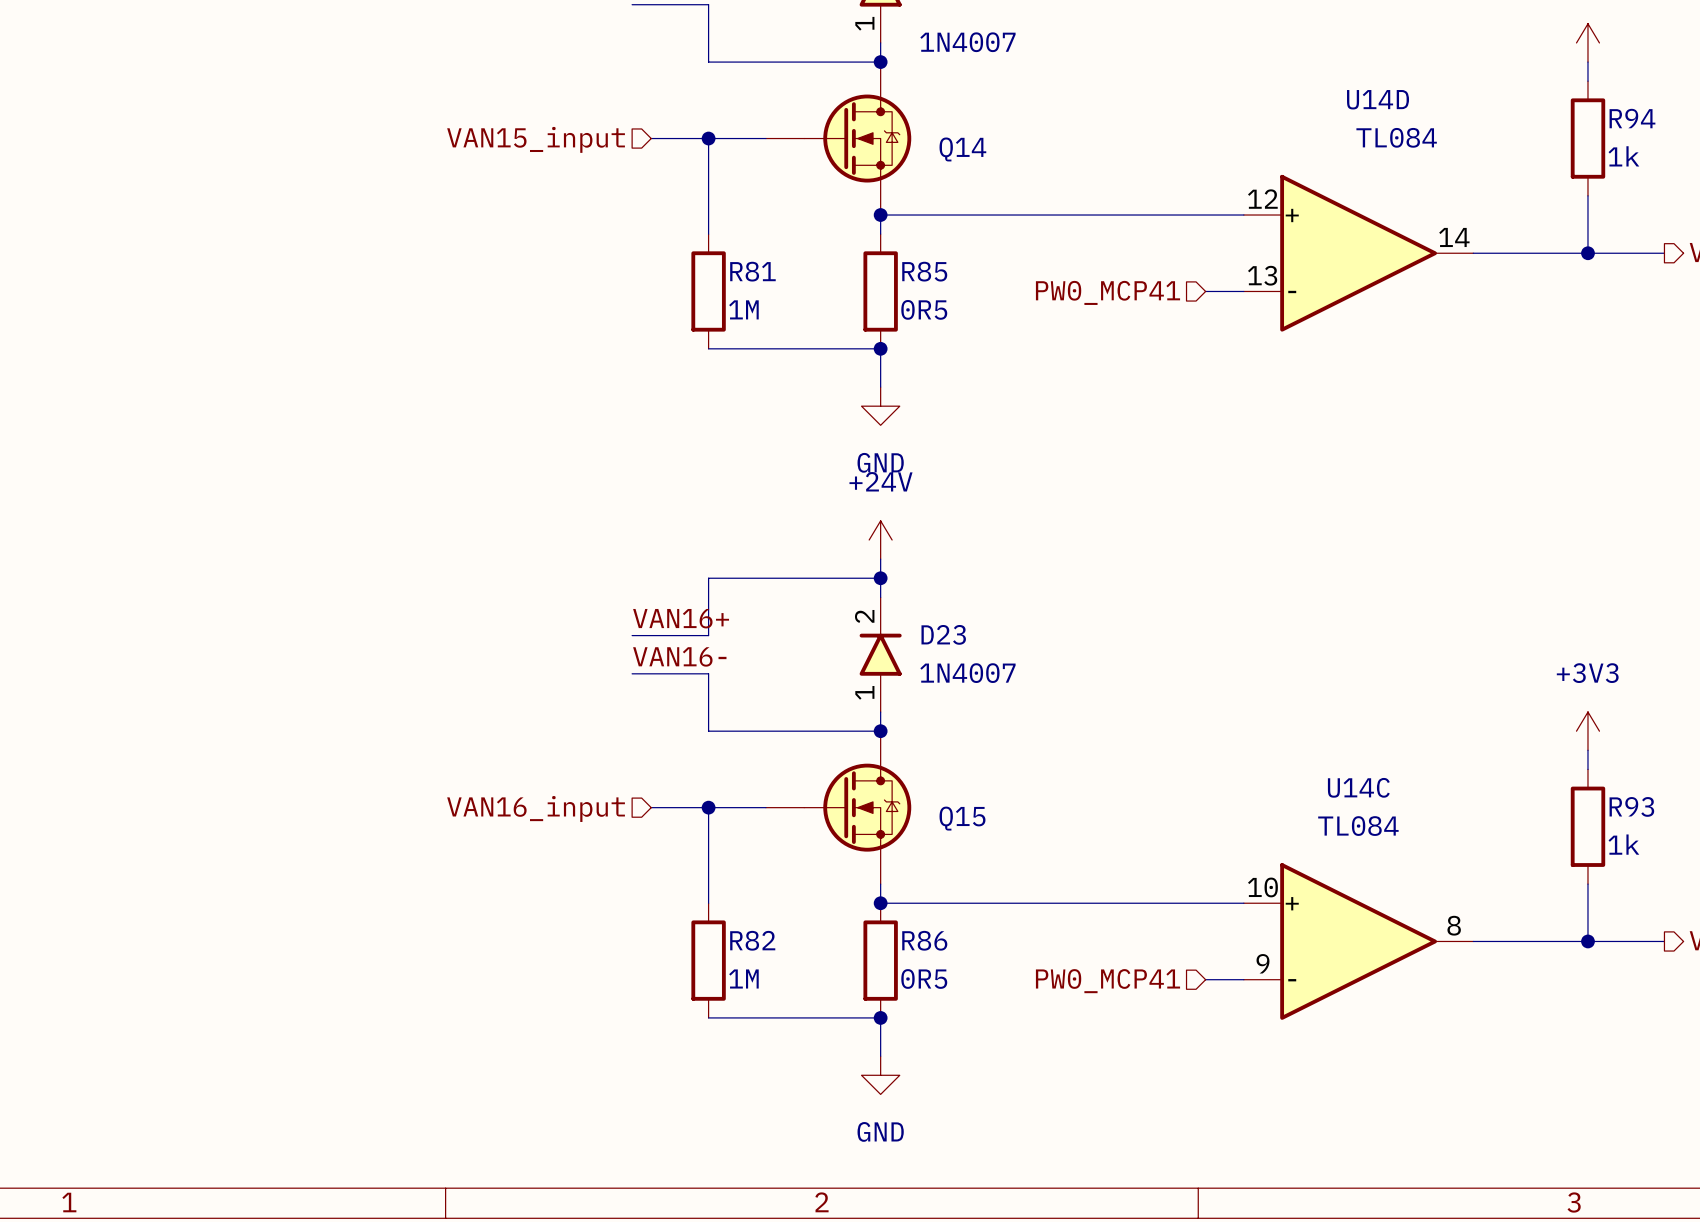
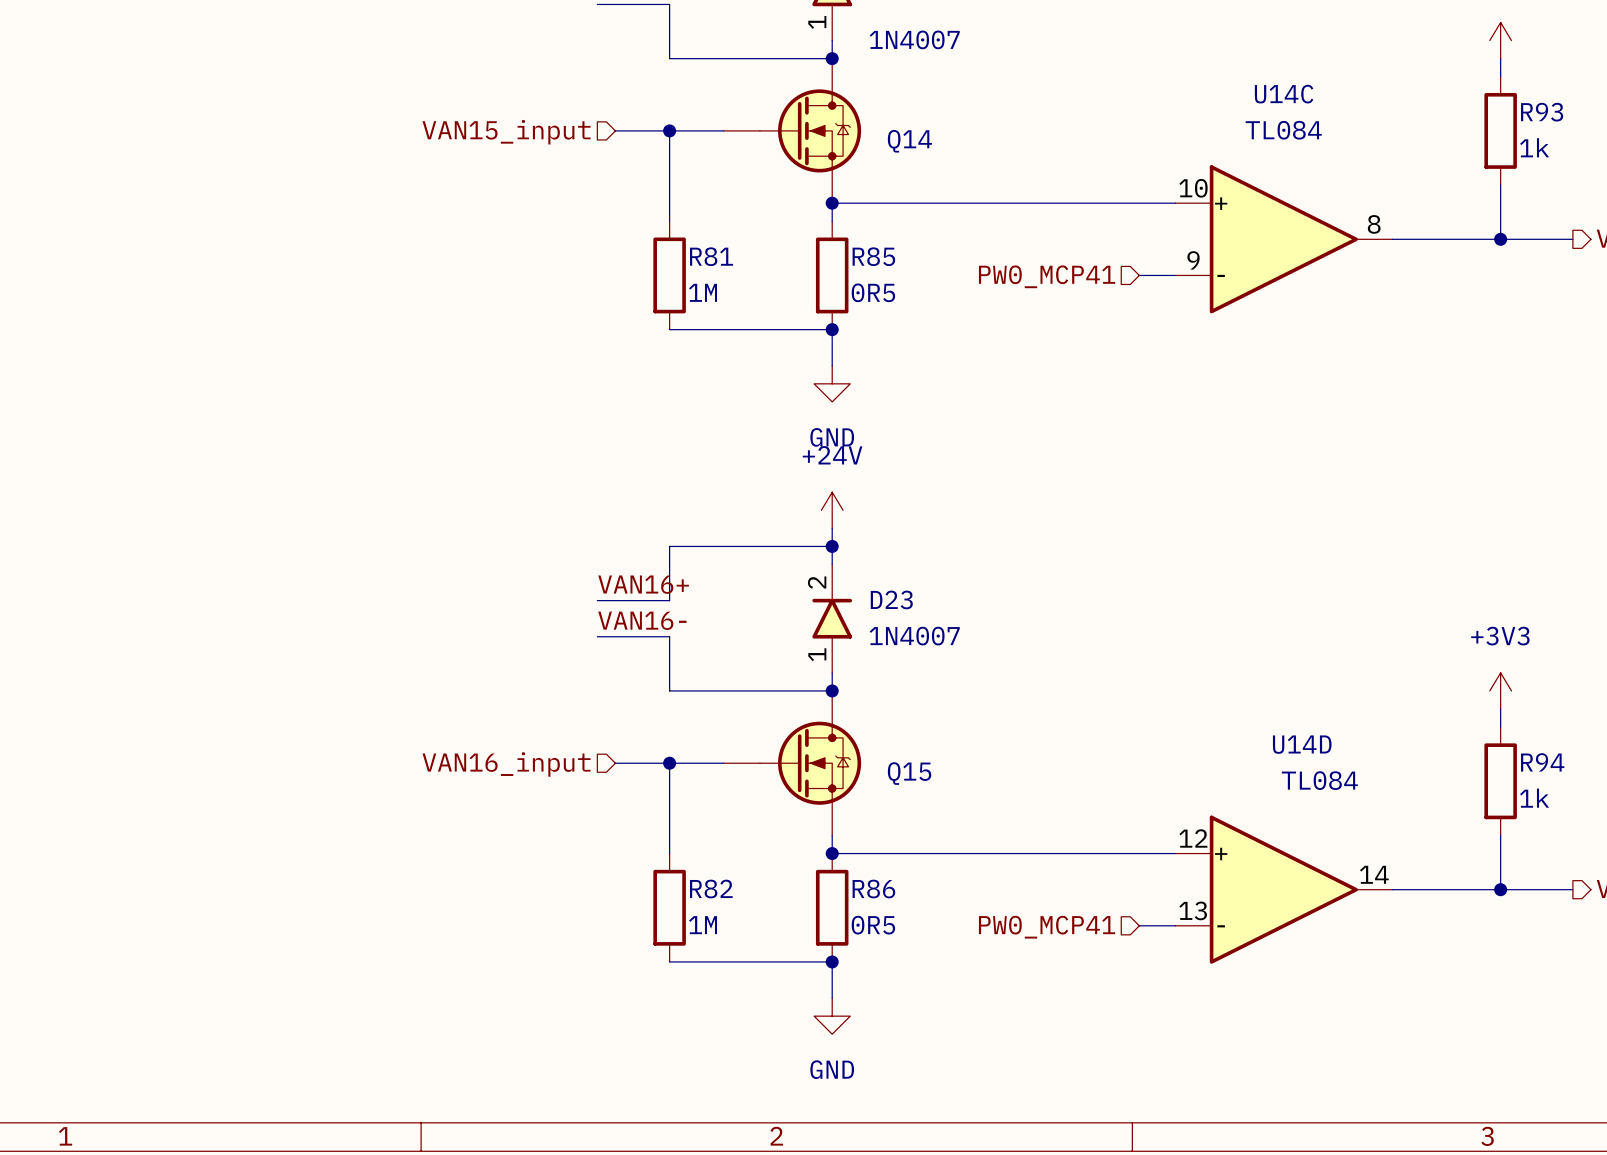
R94 name: R94 (1632, 118) -> R93 (1542, 112)
U14D position: (1358, 253) -> (1283, 889)
R93 name: R93 (1631, 806) -> R94 (1542, 762)
U14C position: (1358, 941) -> (1283, 239)

